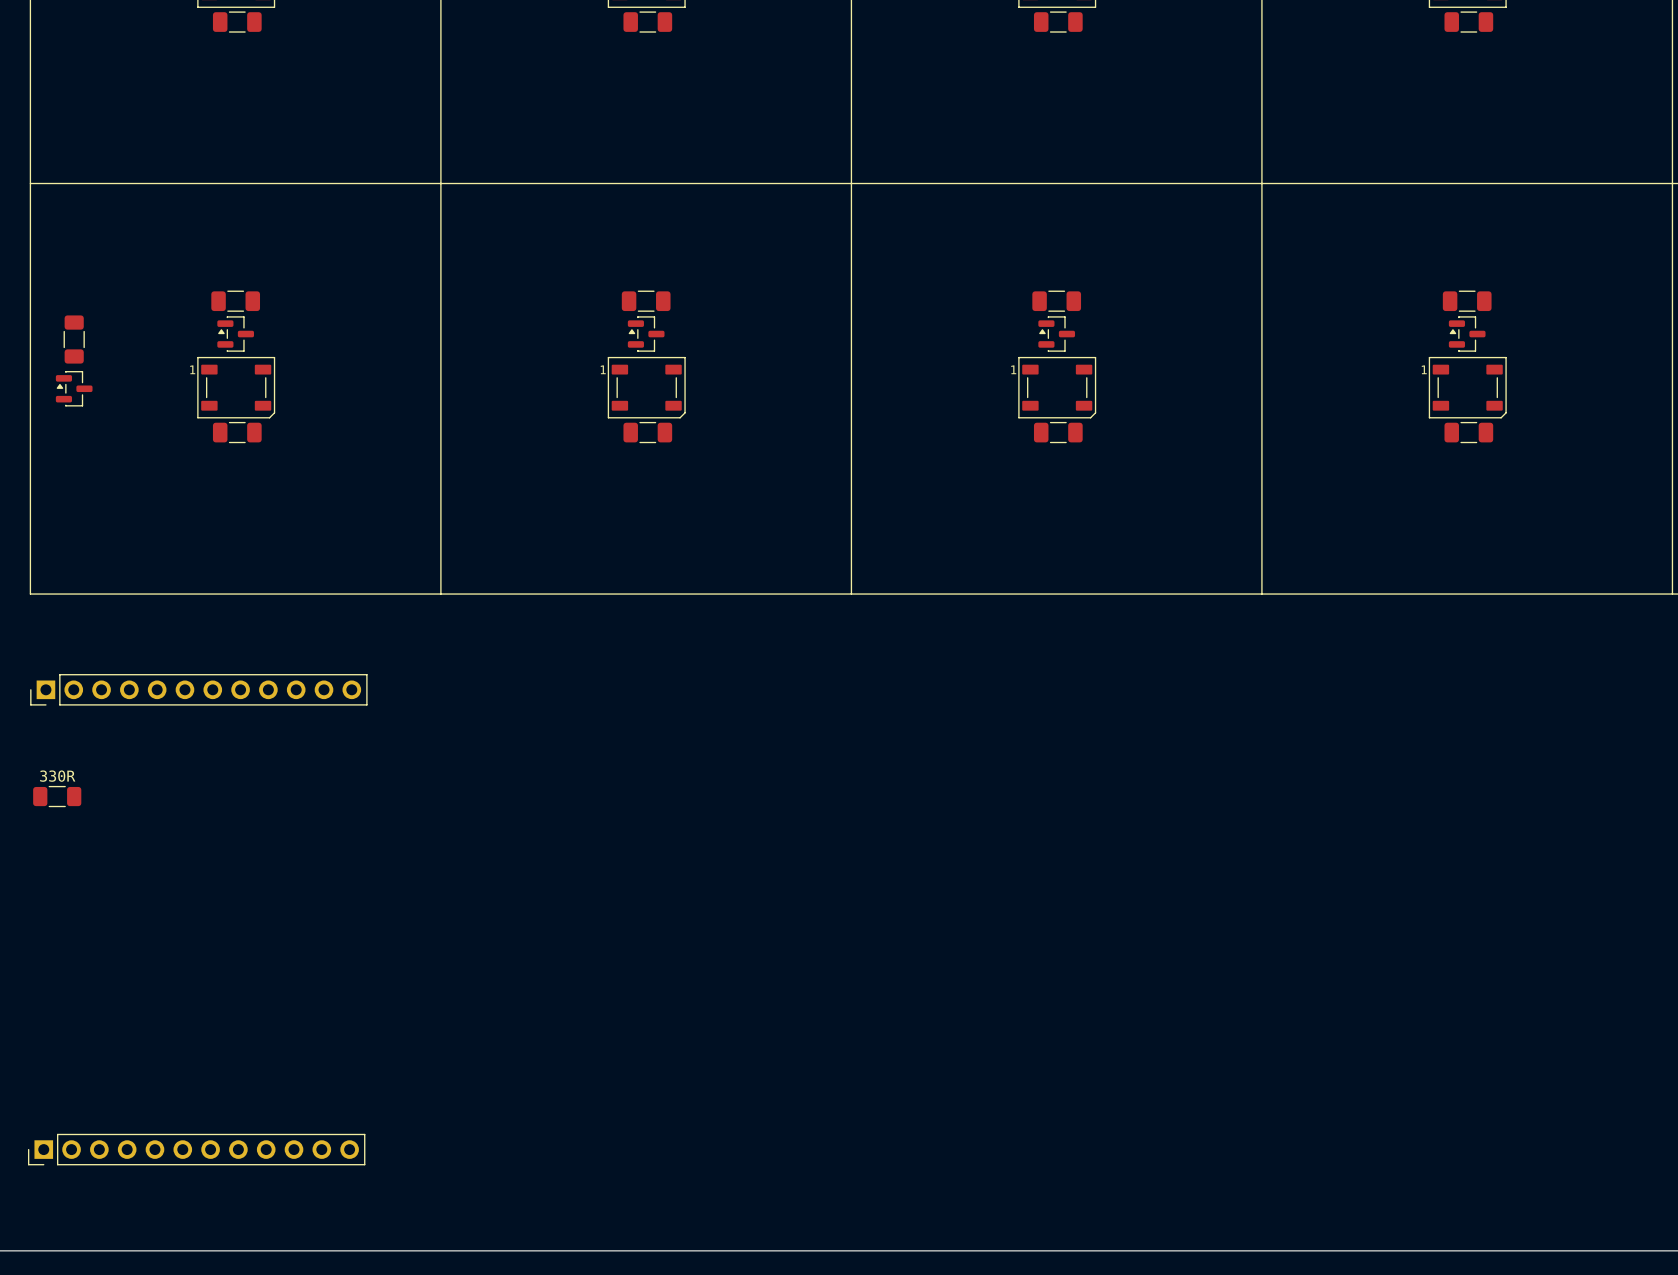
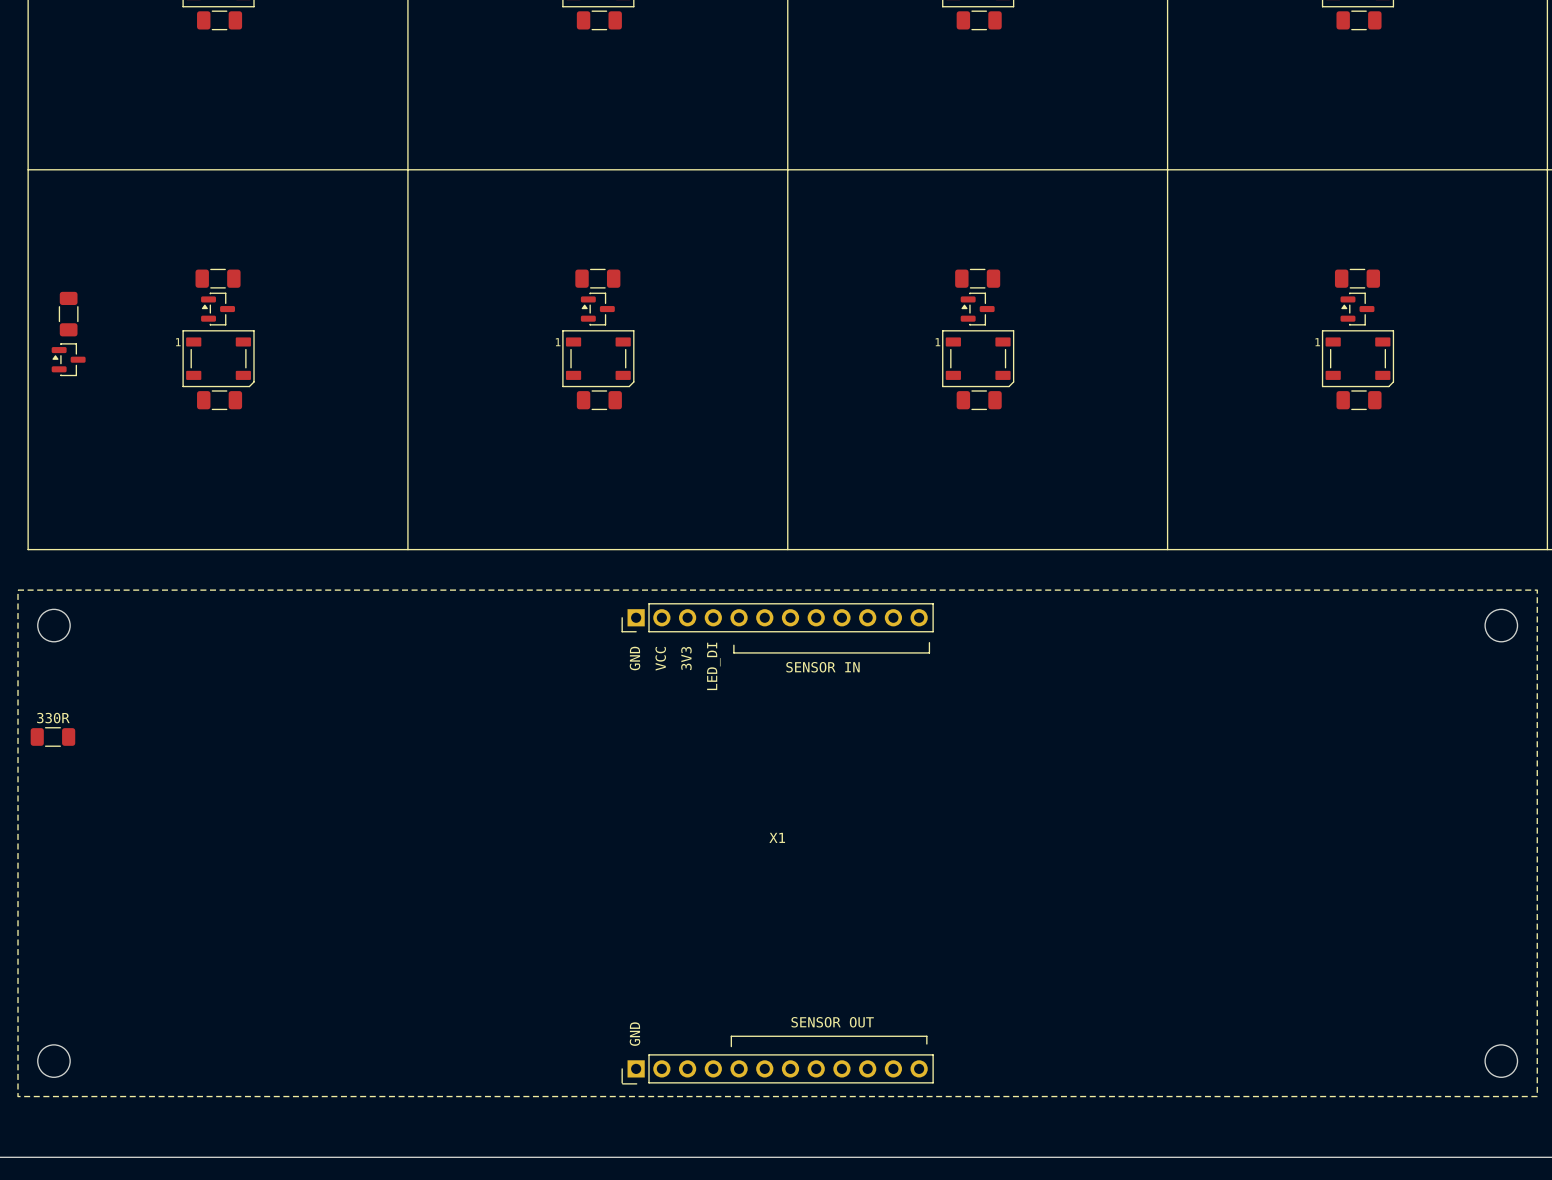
part: (198, 689) -> none
X1: none -> (777, 843)
part: (196, 1149) -> none

